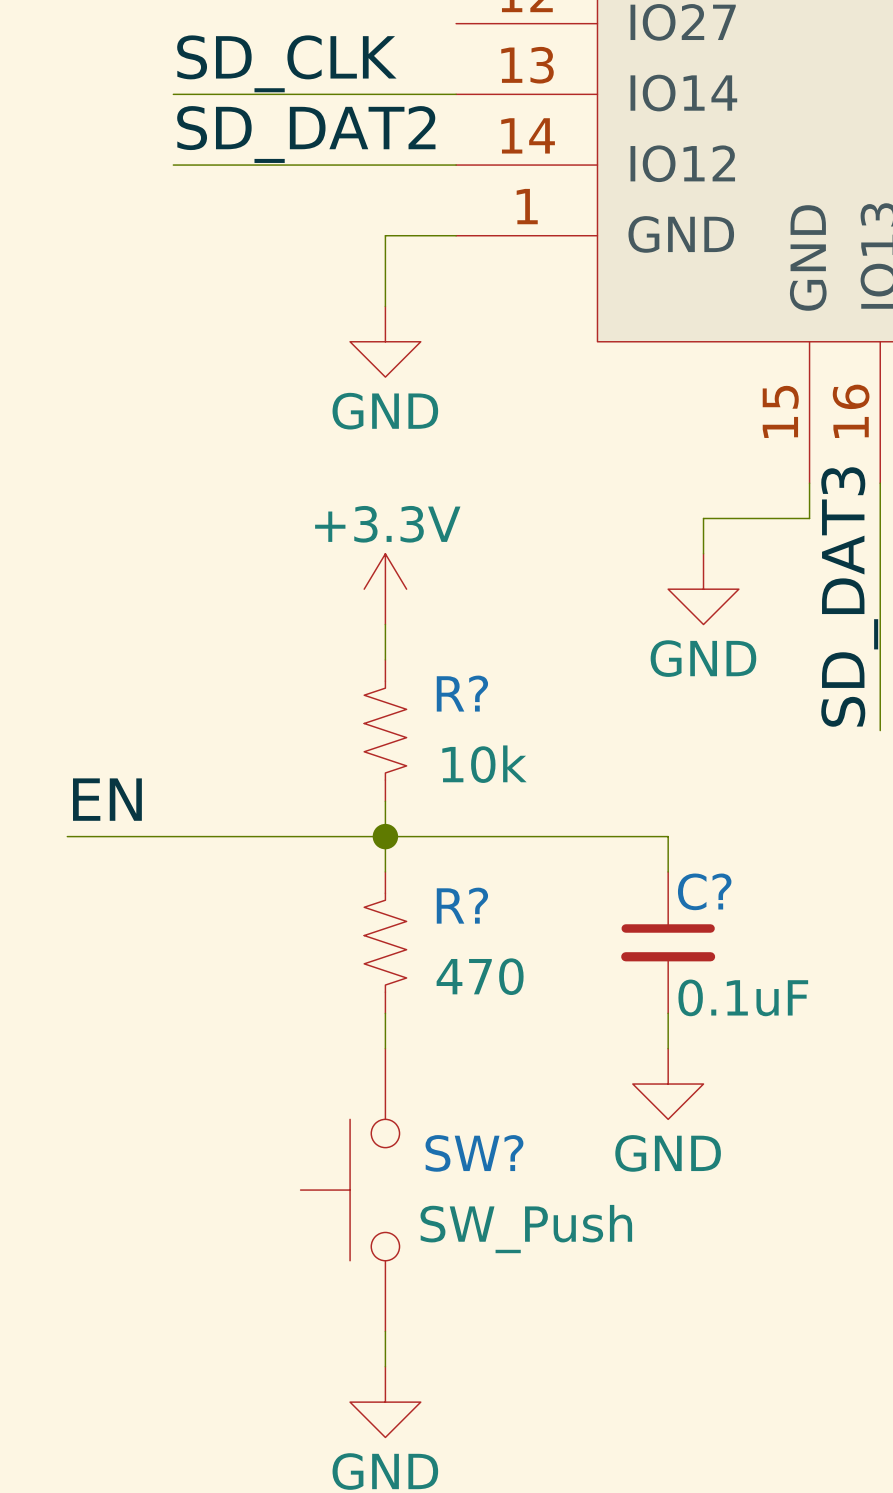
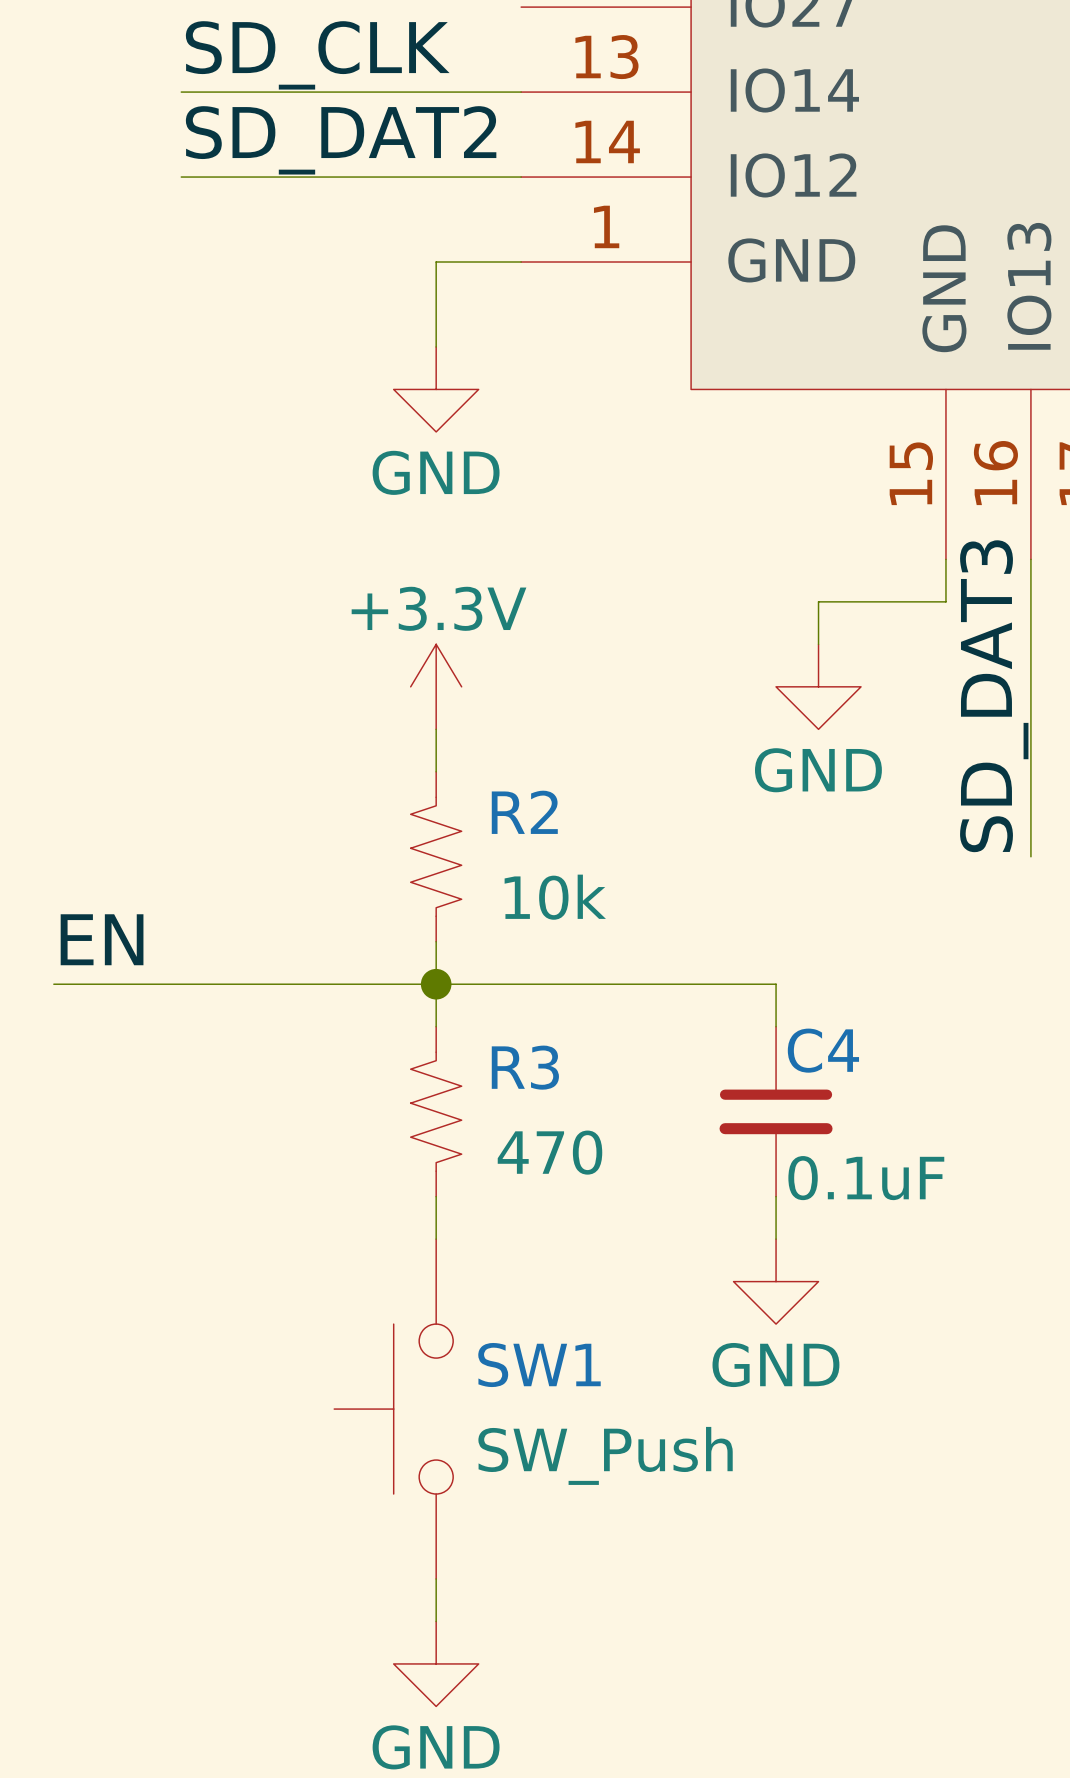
R? name: R? (462, 693) -> R2 (524, 812)
C? name: C? (704, 891) -> C4 (823, 1050)
R? name: R? (462, 905) -> R3 (525, 1067)
SW? name: SW? (474, 1153) -> SW1 (539, 1365)

